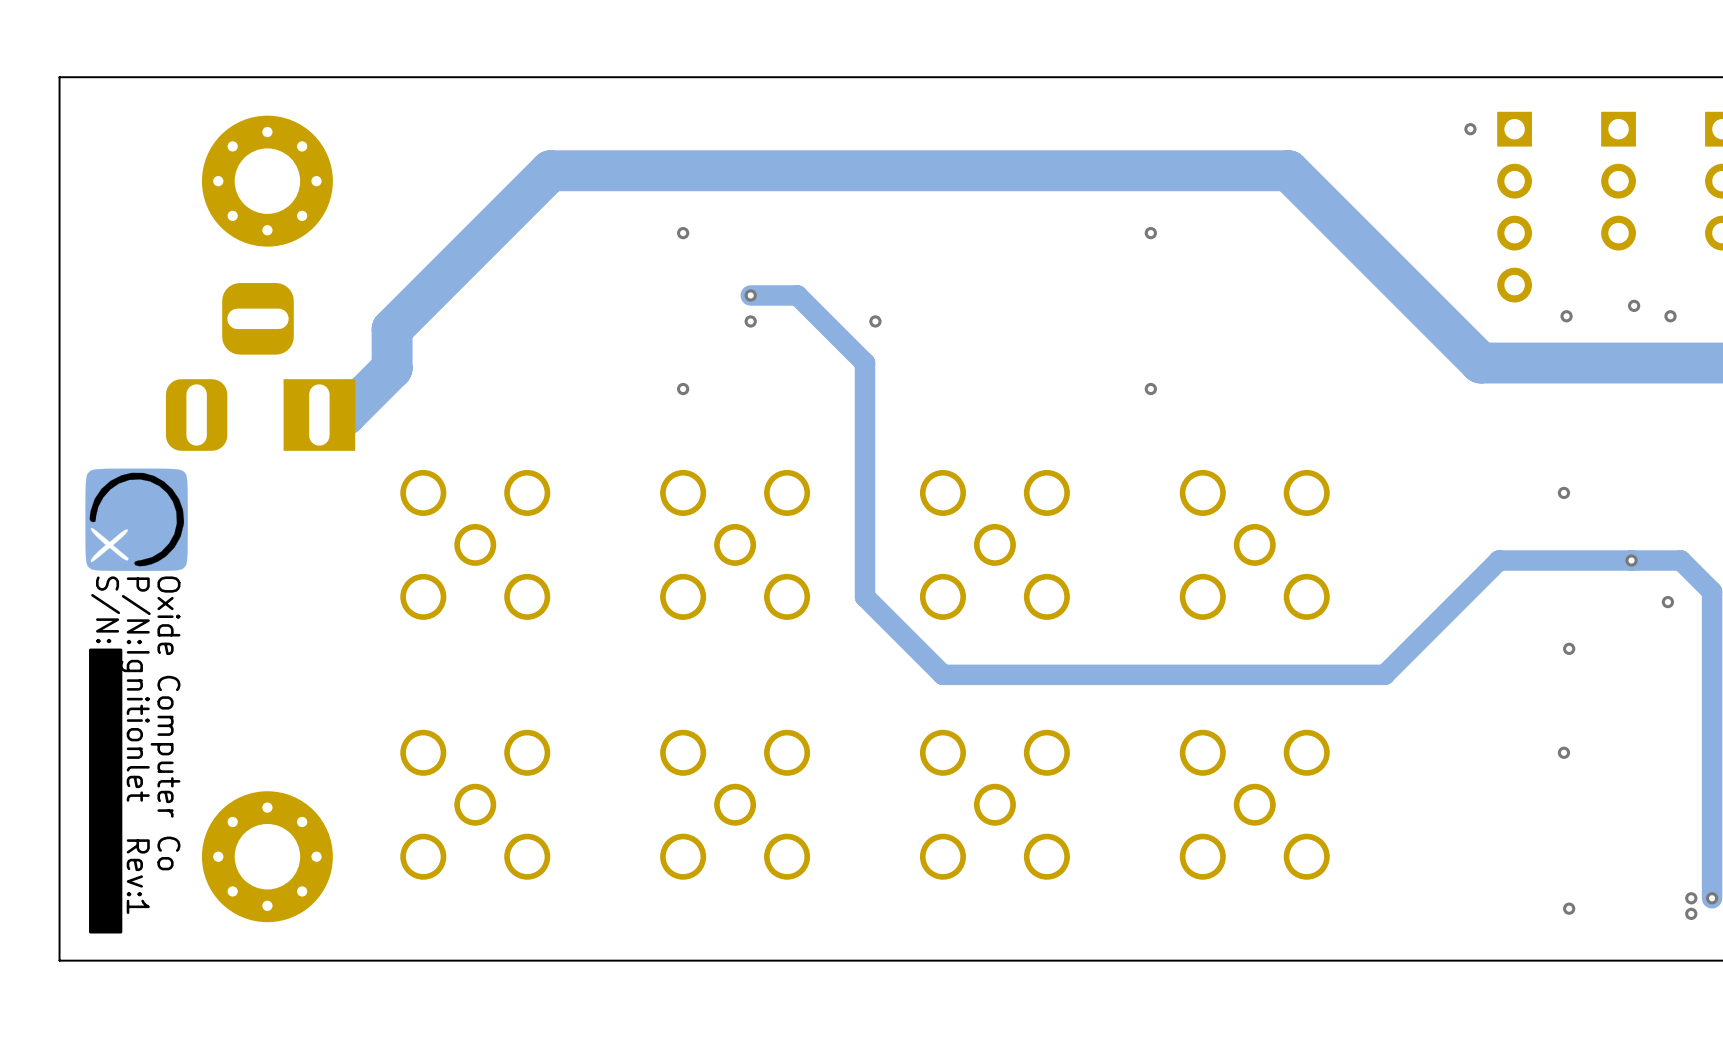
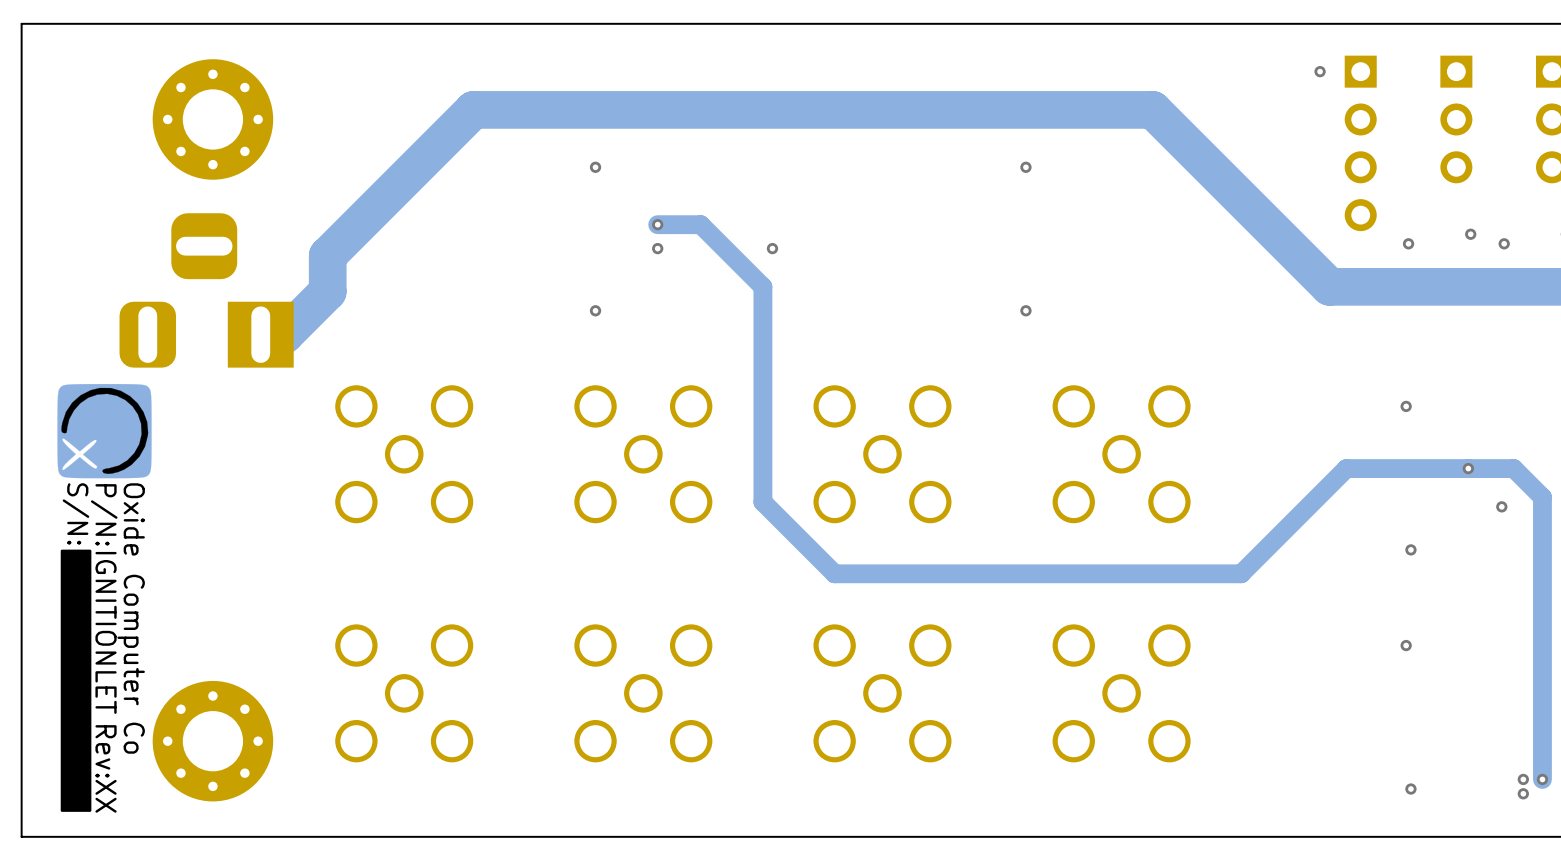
drawing shape: [85, 468, 188, 934] -> [57, 384, 152, 813]

